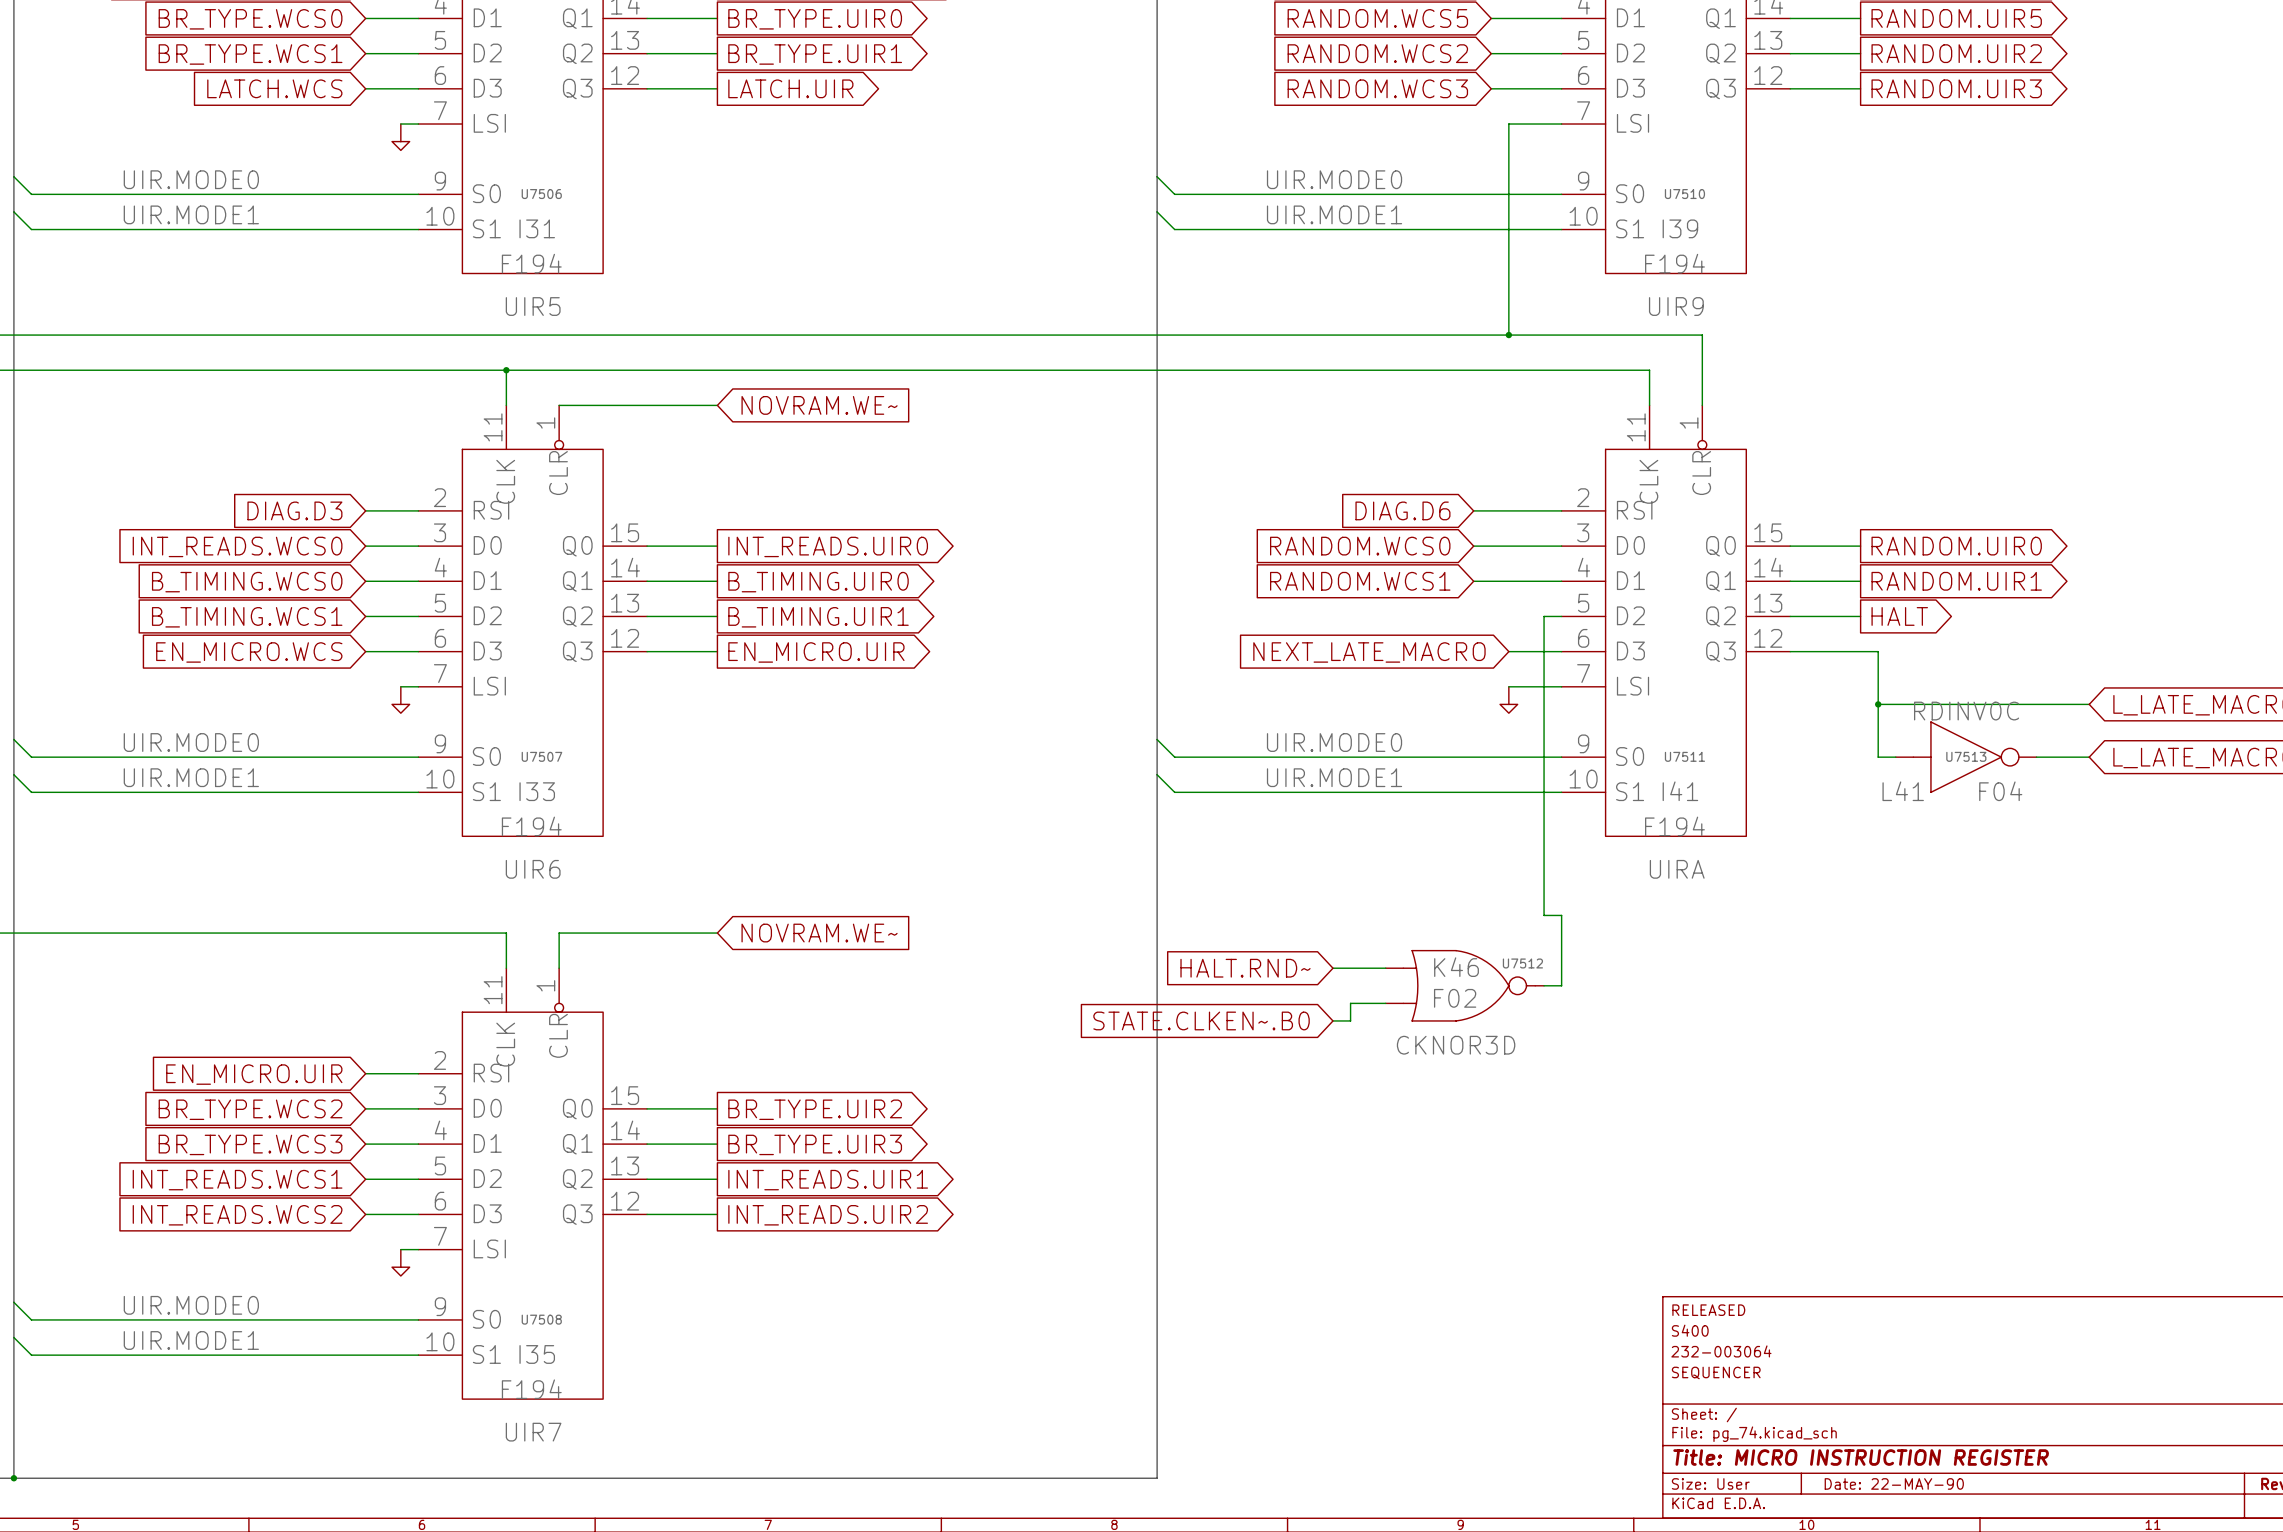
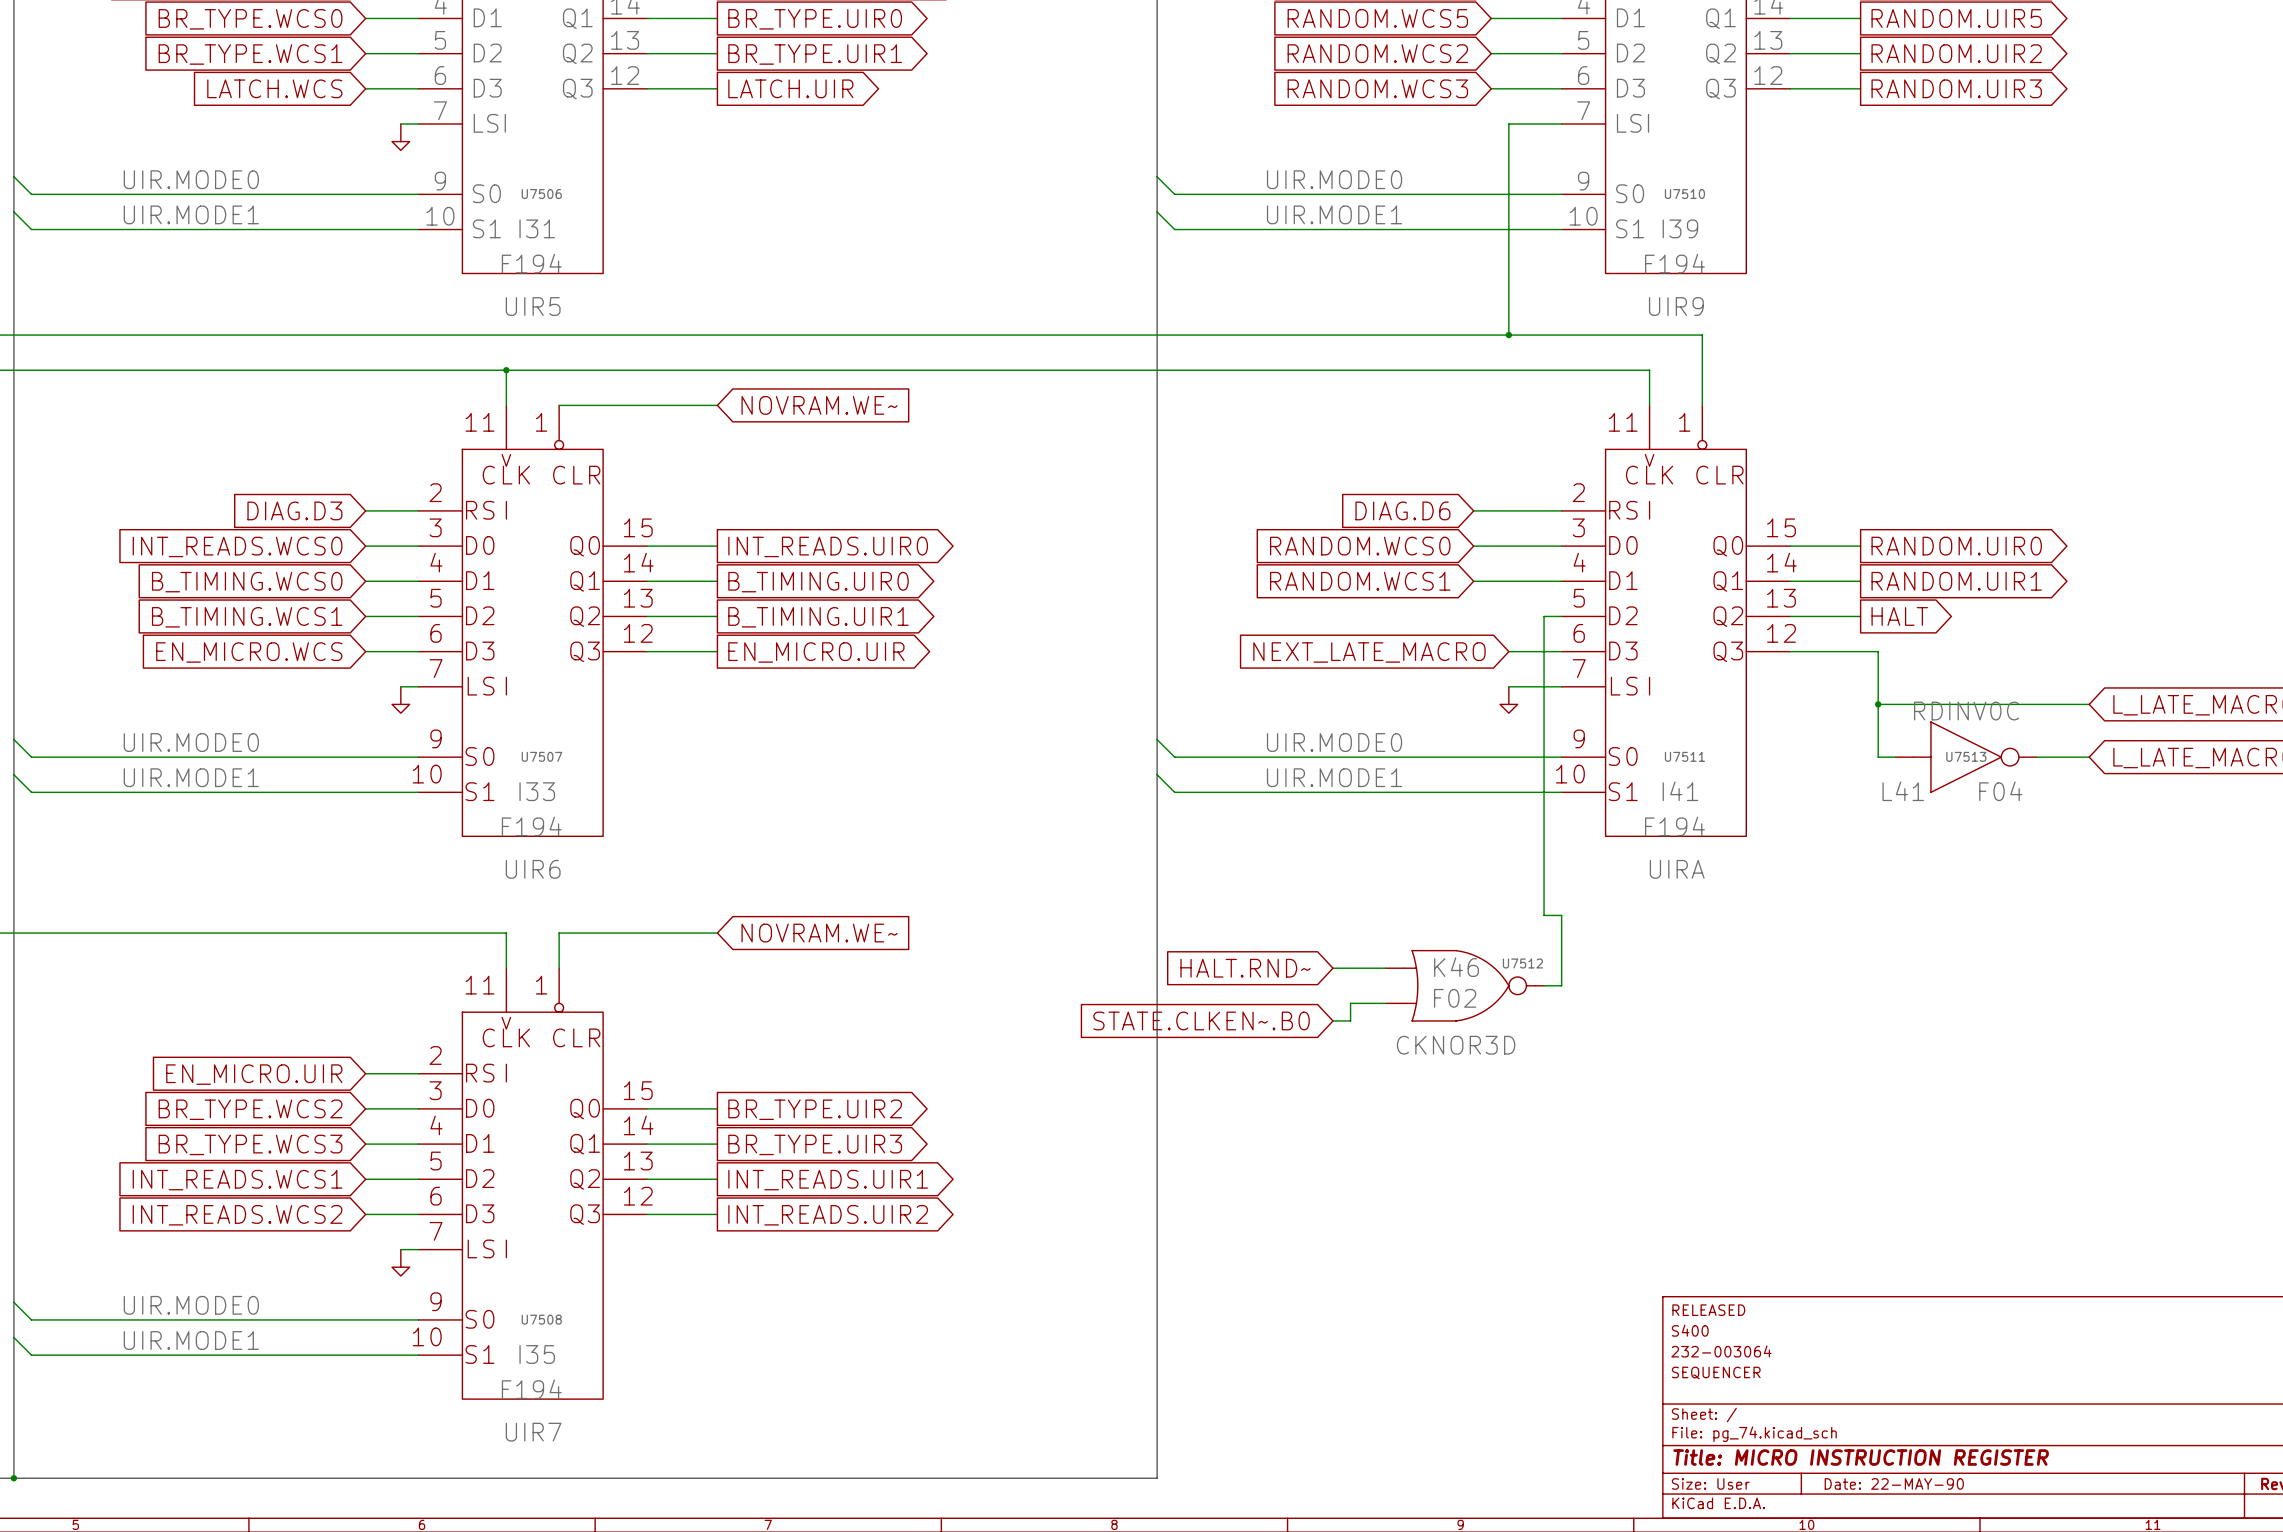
U7507 symbol: [418, 405, 648, 837] -> [418, 405, 648, 837]
U7511 symbol: [1561, 405, 1791, 837] -> [1561, 405, 1791, 837]
U7508 symbol: [418, 968, 648, 1400] -> [418, 968, 648, 1400]

